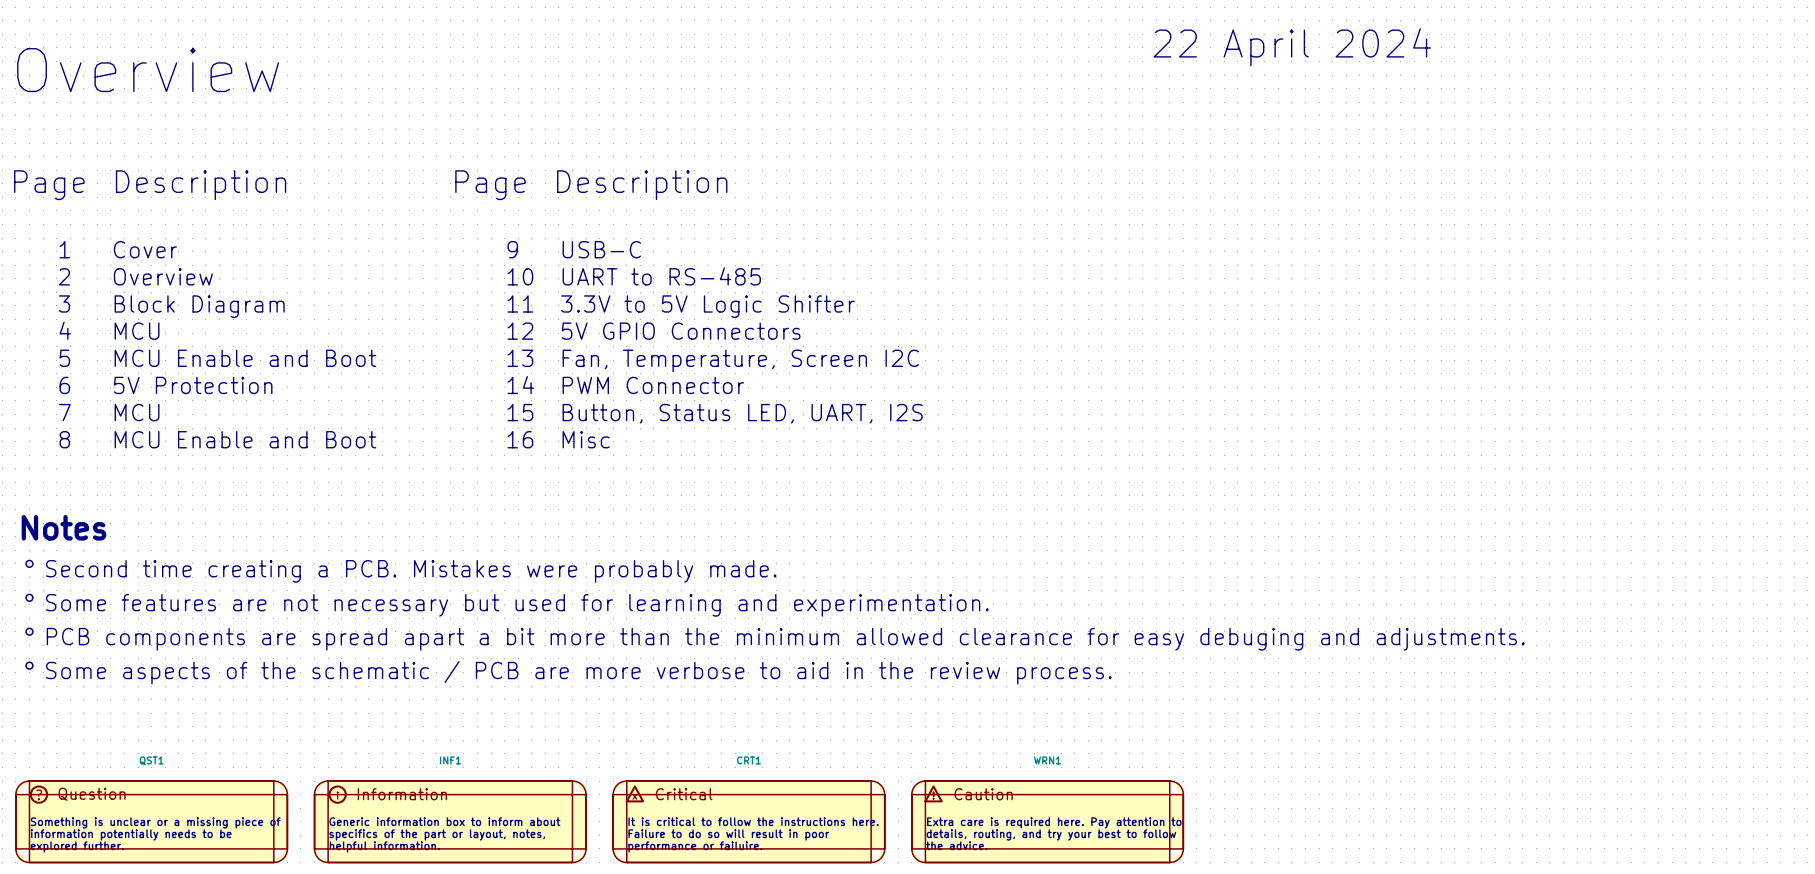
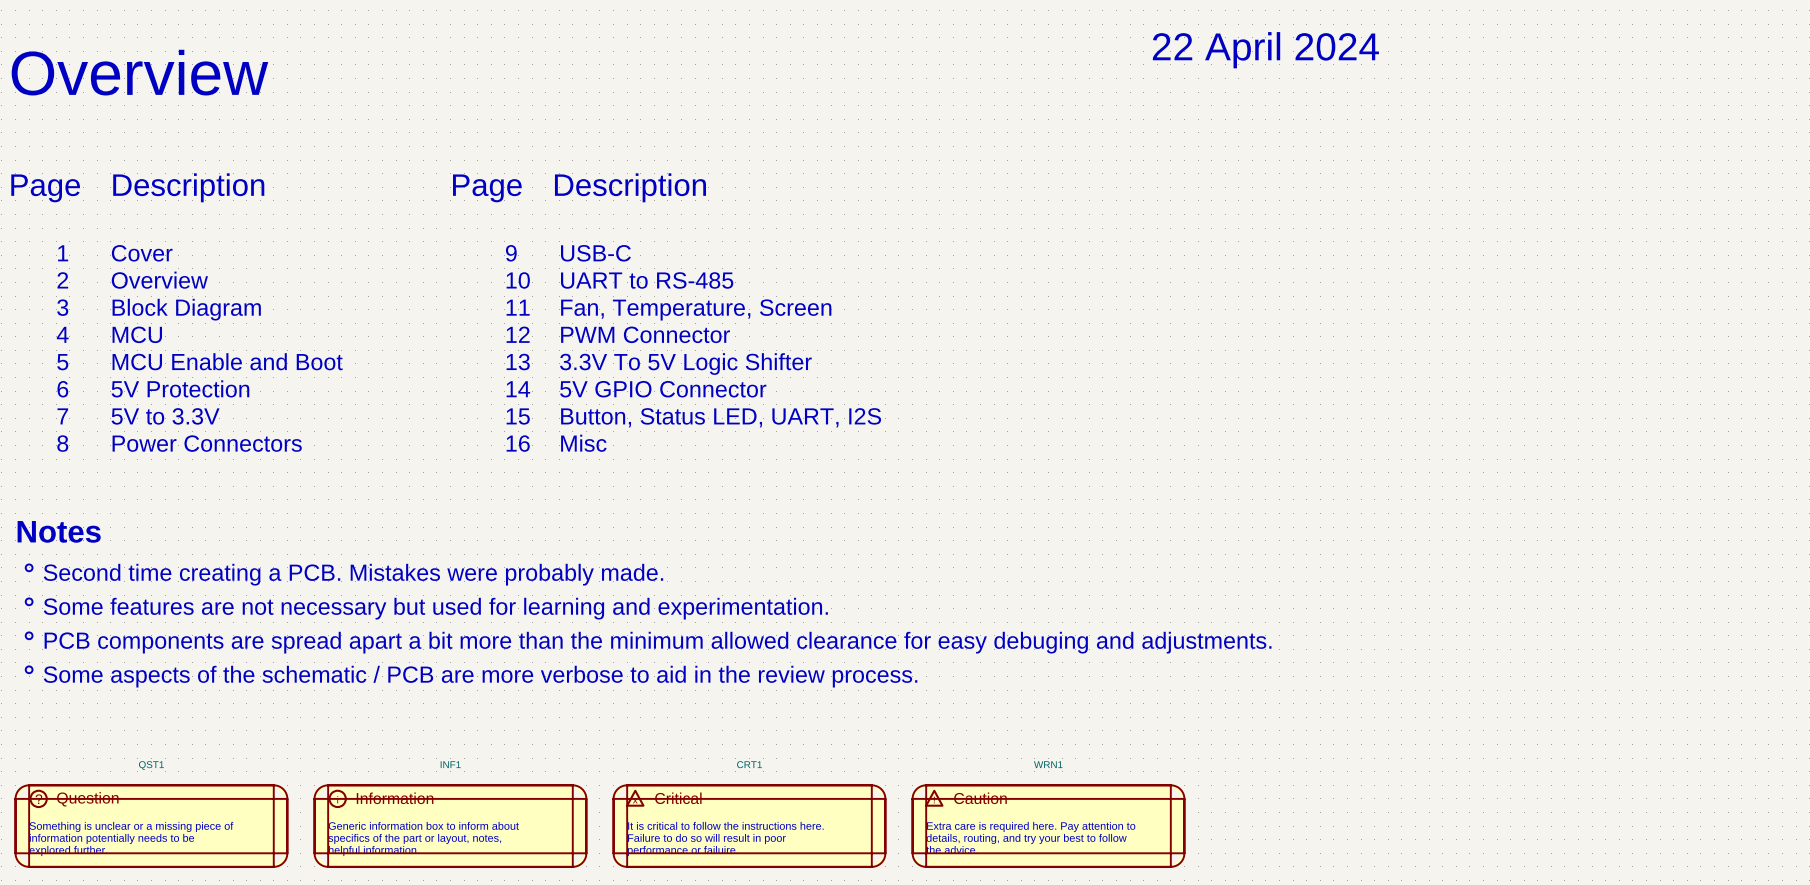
text: 3.3V to 5V Logic Shifter (707, 306) -> Fan, Temperature, Screen (696, 309)
text: 5V GPIO Connectors (681, 331) -> PWM Connector (645, 334)
text: Fan, Temperature, Screen I2C (740, 360) -> 3.3V To 5V Logic Shifter (685, 364)
text: PWM Connector (653, 385) -> 5V GPIO Connector (663, 389)
text: MCU (137, 412) -> 5V to 3.3V (165, 416)
text: MCU Enable and Boot (245, 439) -> Power Connectors (207, 443)

